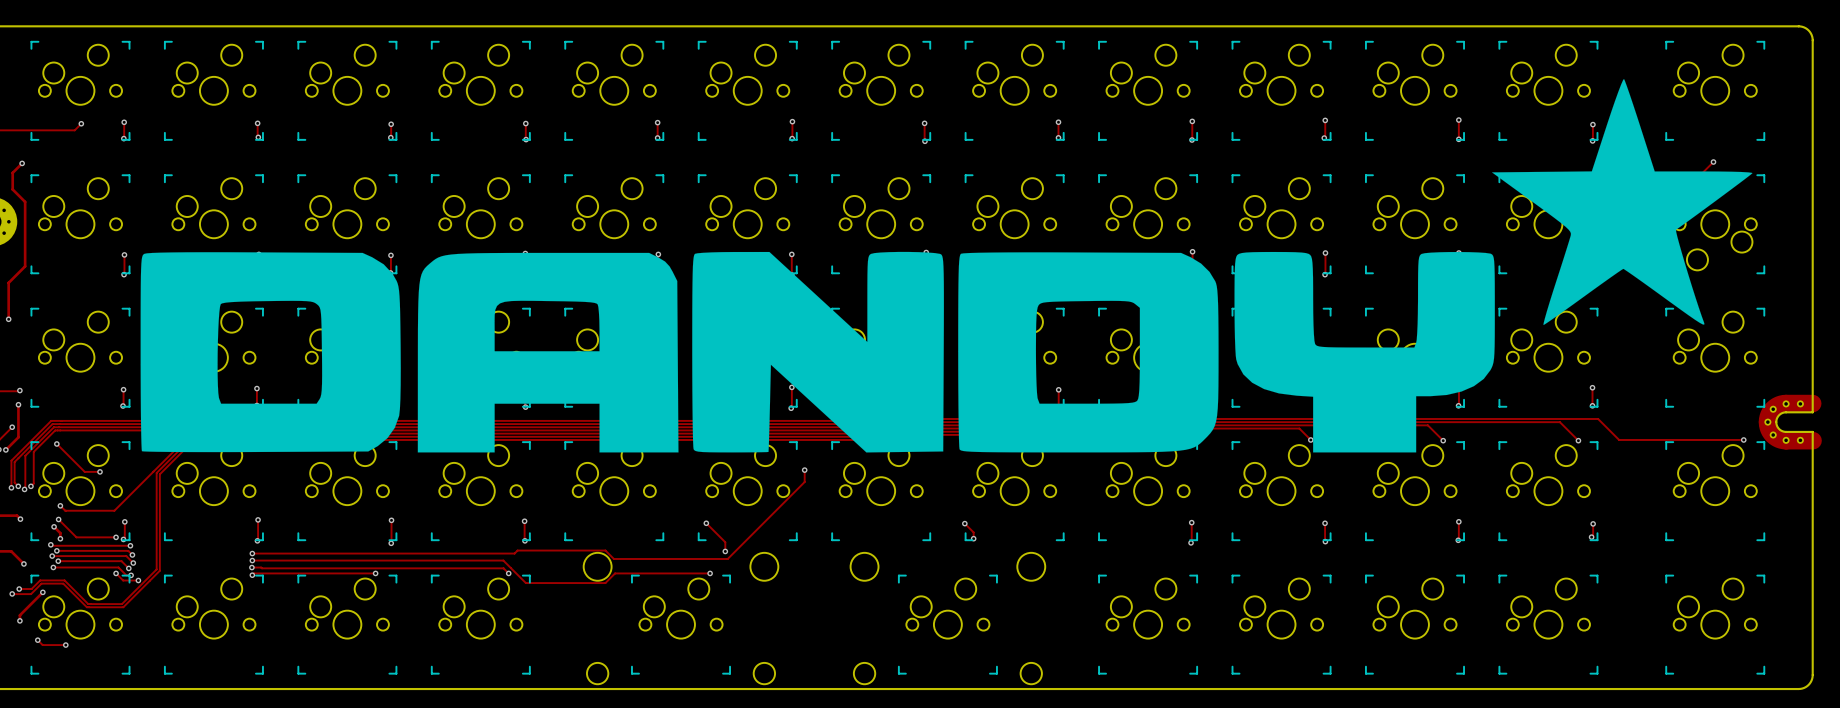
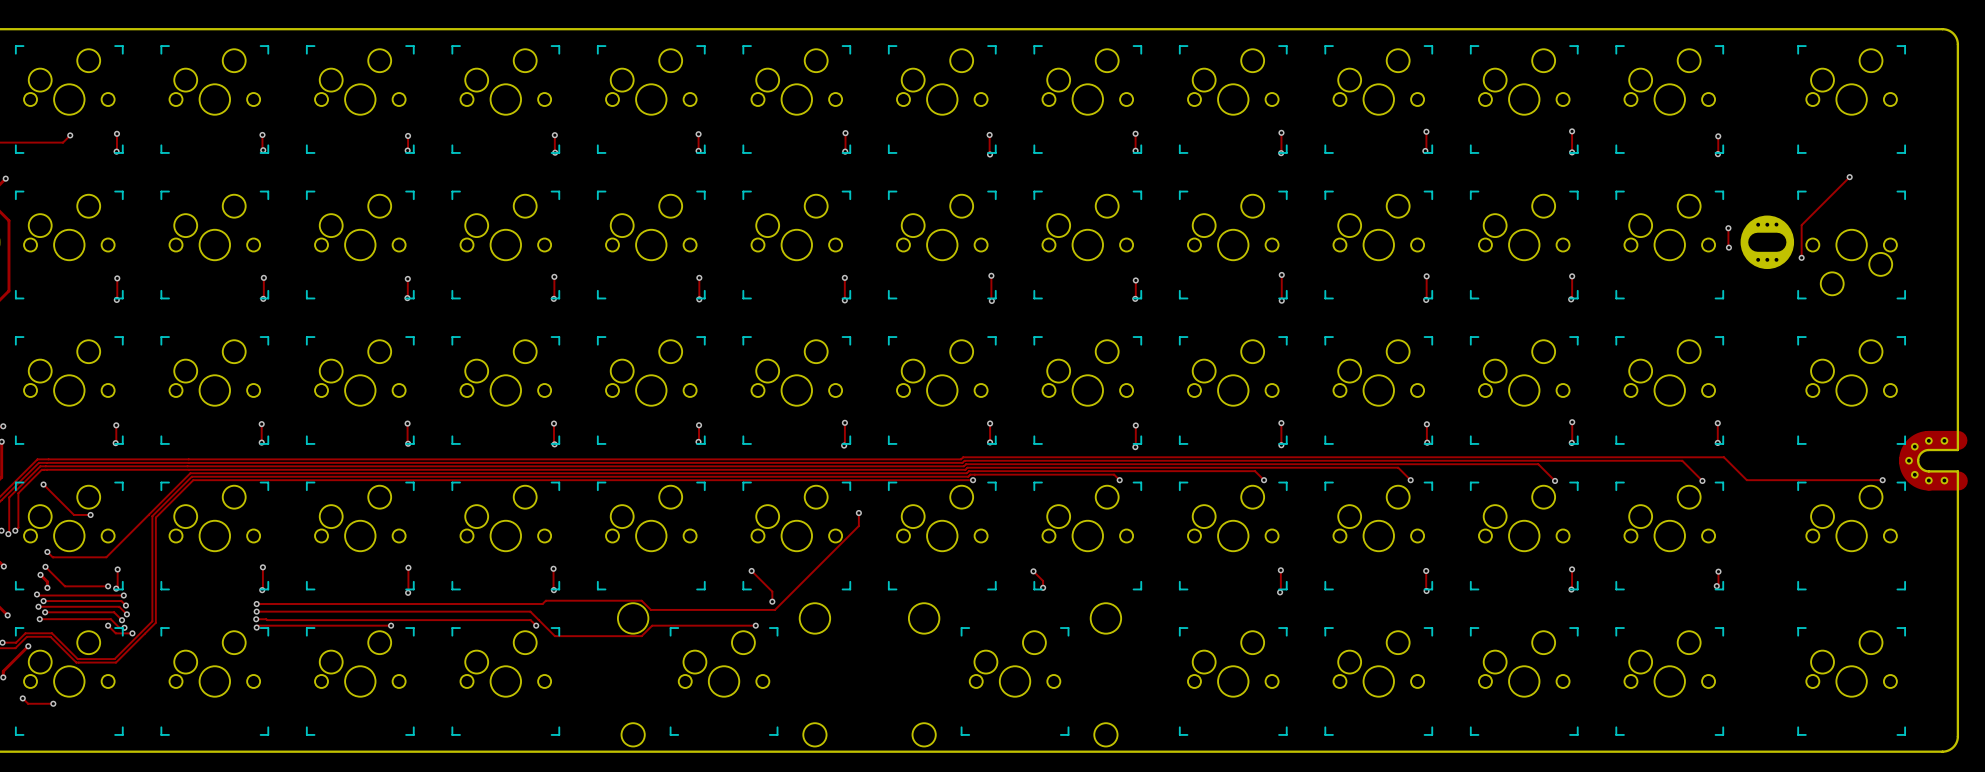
drawing: [140, 78, 1753, 453] -> none

